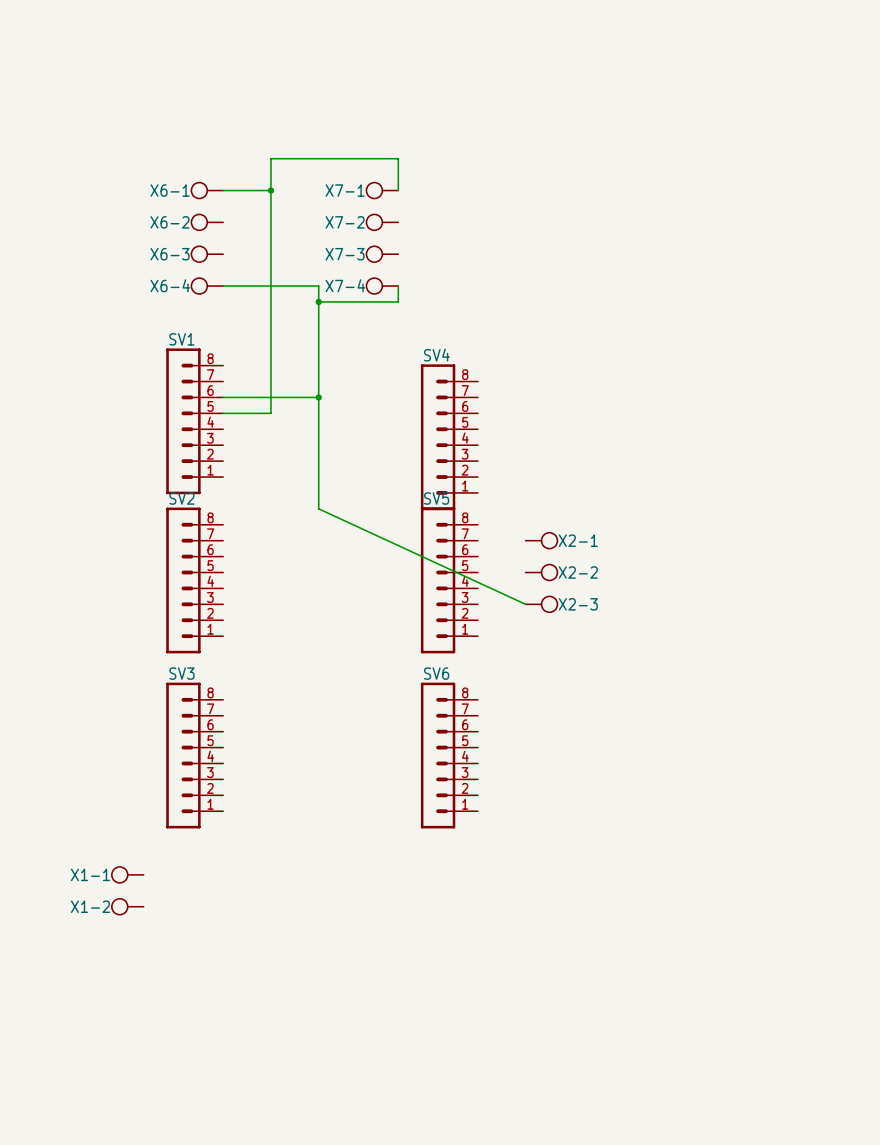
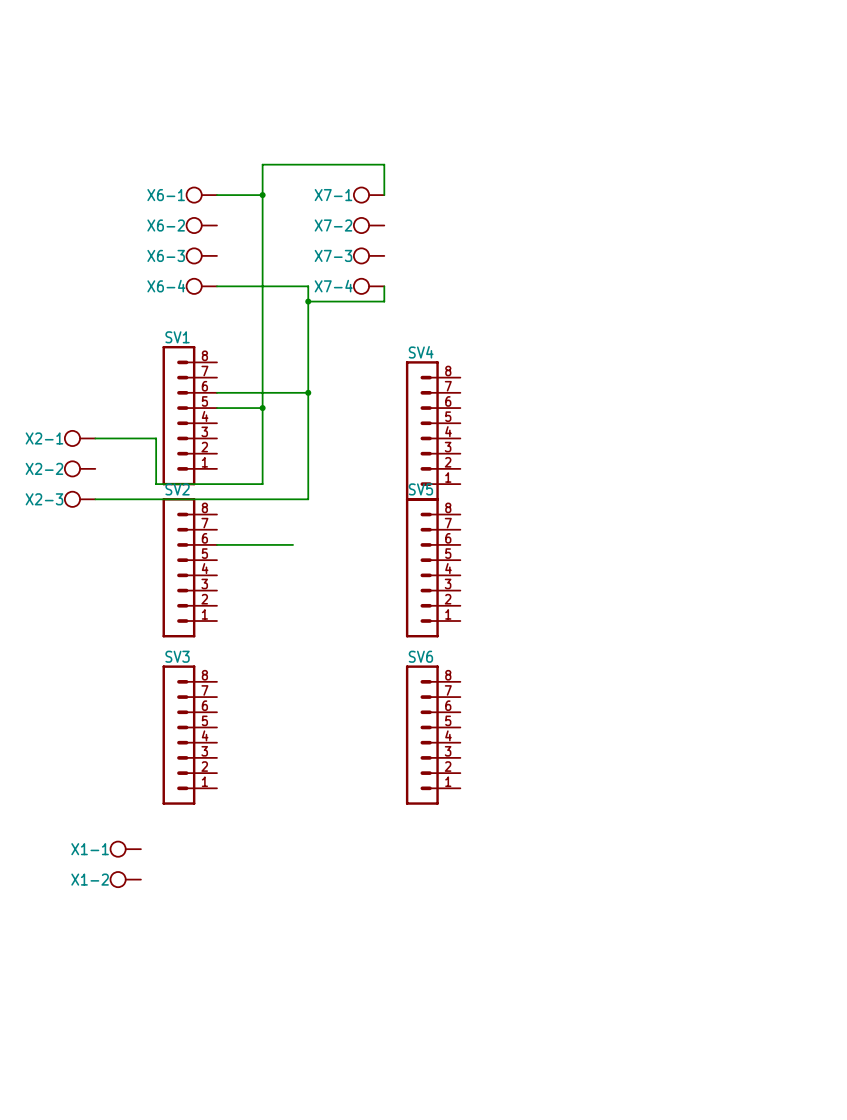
wire: none -> (262, 408) (262, 484) (156, 484) (156, 438) (95, 438)
junction: none -> (262, 408)
wire: (318, 508) (525, 604) -> (308, 499) (95, 499)
X2-1 position: (541, 540) -> (79, 438)
X2-1 rotation: 0° (549, 540) -> 180° (72, 438)
wire: none -> (216, 544) (293, 544)
X2-2 position: (541, 572) -> (79, 468)
X2-2 rotation: 0° (549, 572) -> 180° (72, 468)
X2-3 position: (541, 604) -> (79, 499)
X2-3 rotation: 0° (549, 604) -> 180° (72, 499)

